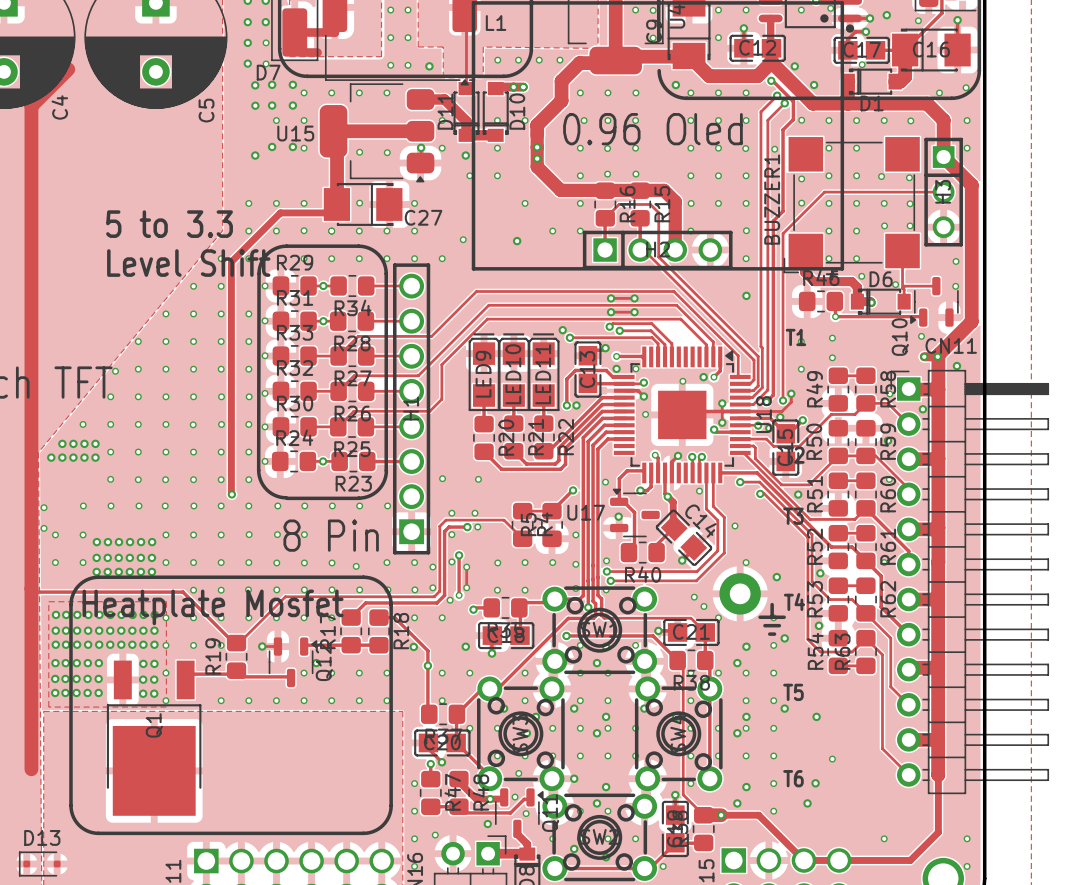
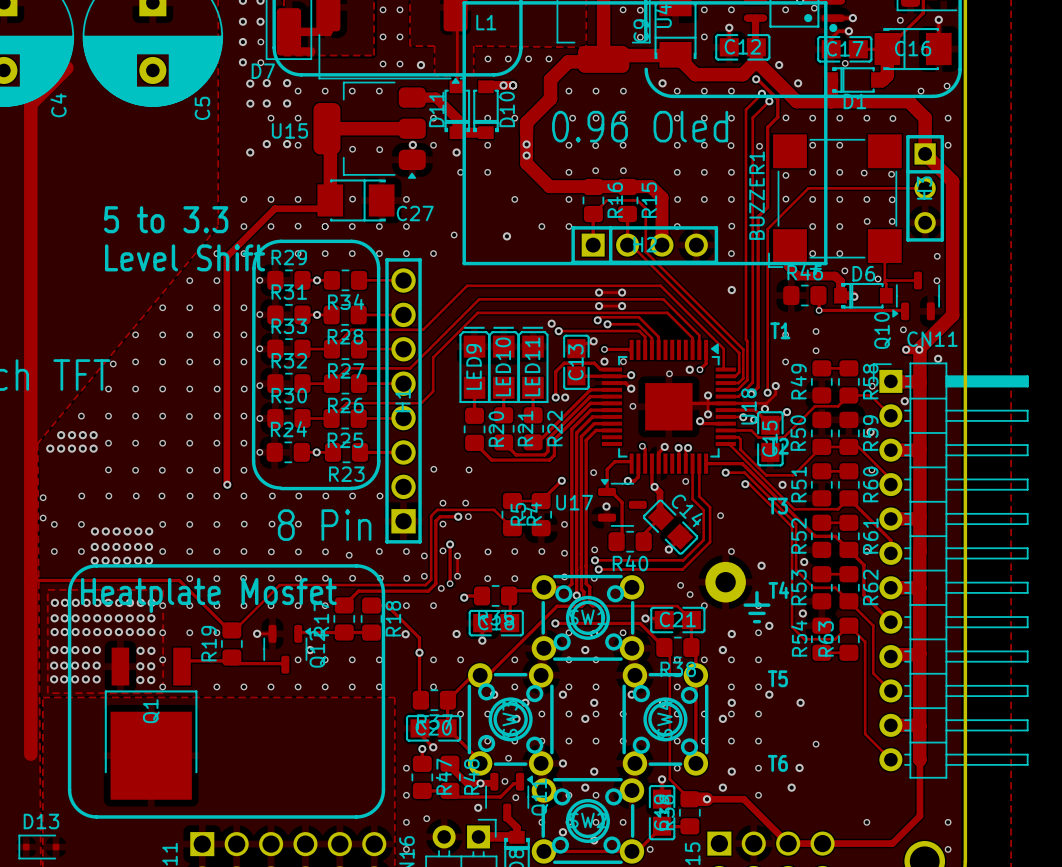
via: (886, 15) -> none

